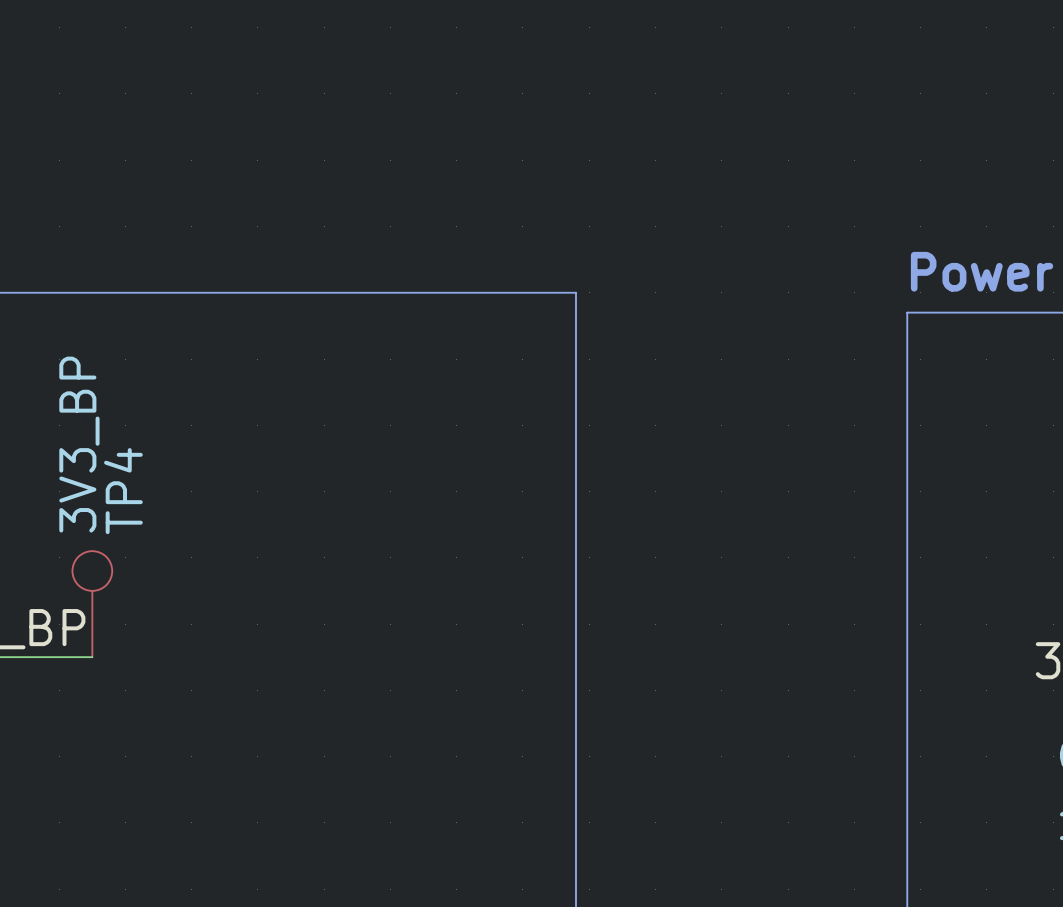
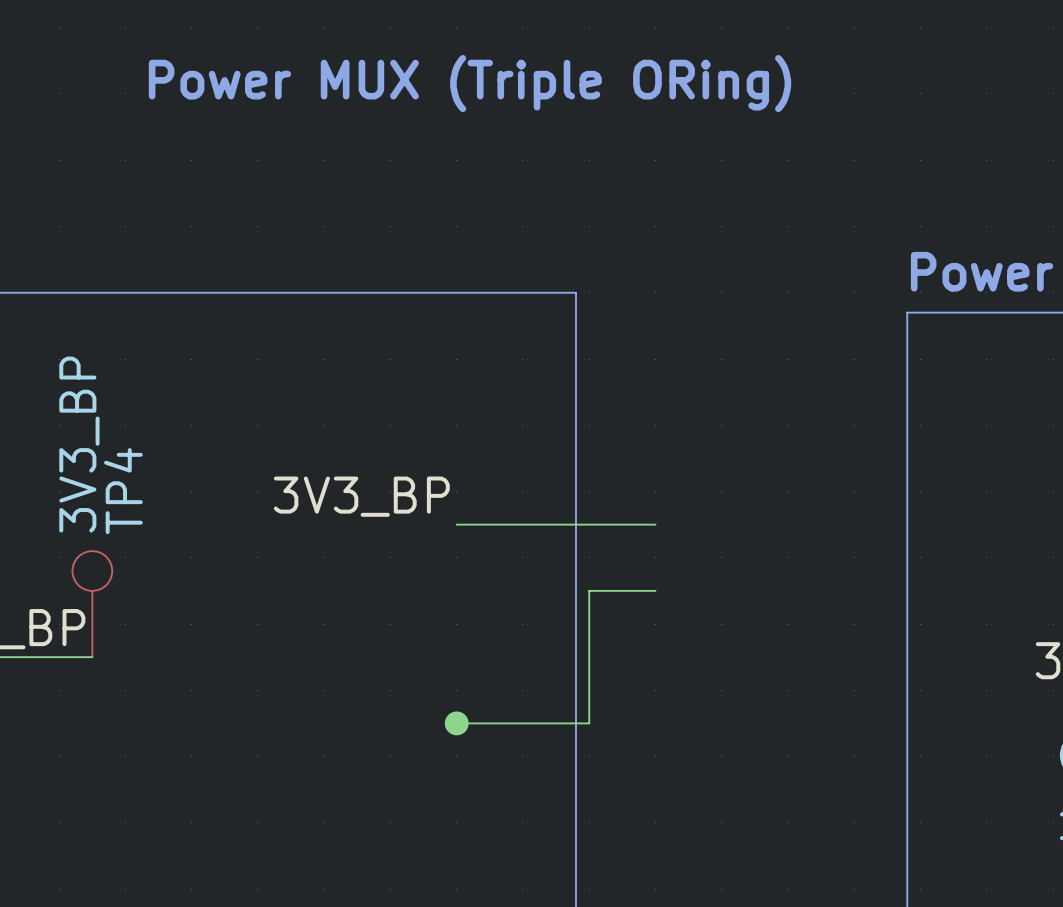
text: none -> Power MUX (Triple ORing) (469, 83)
label: none -> 3V3_BP (361, 496)
wire: none -> (456, 524) (655, 524)
wire: none -> (655, 590) (589, 590) (589, 723) (456, 723)
junction: none -> (456, 723)

